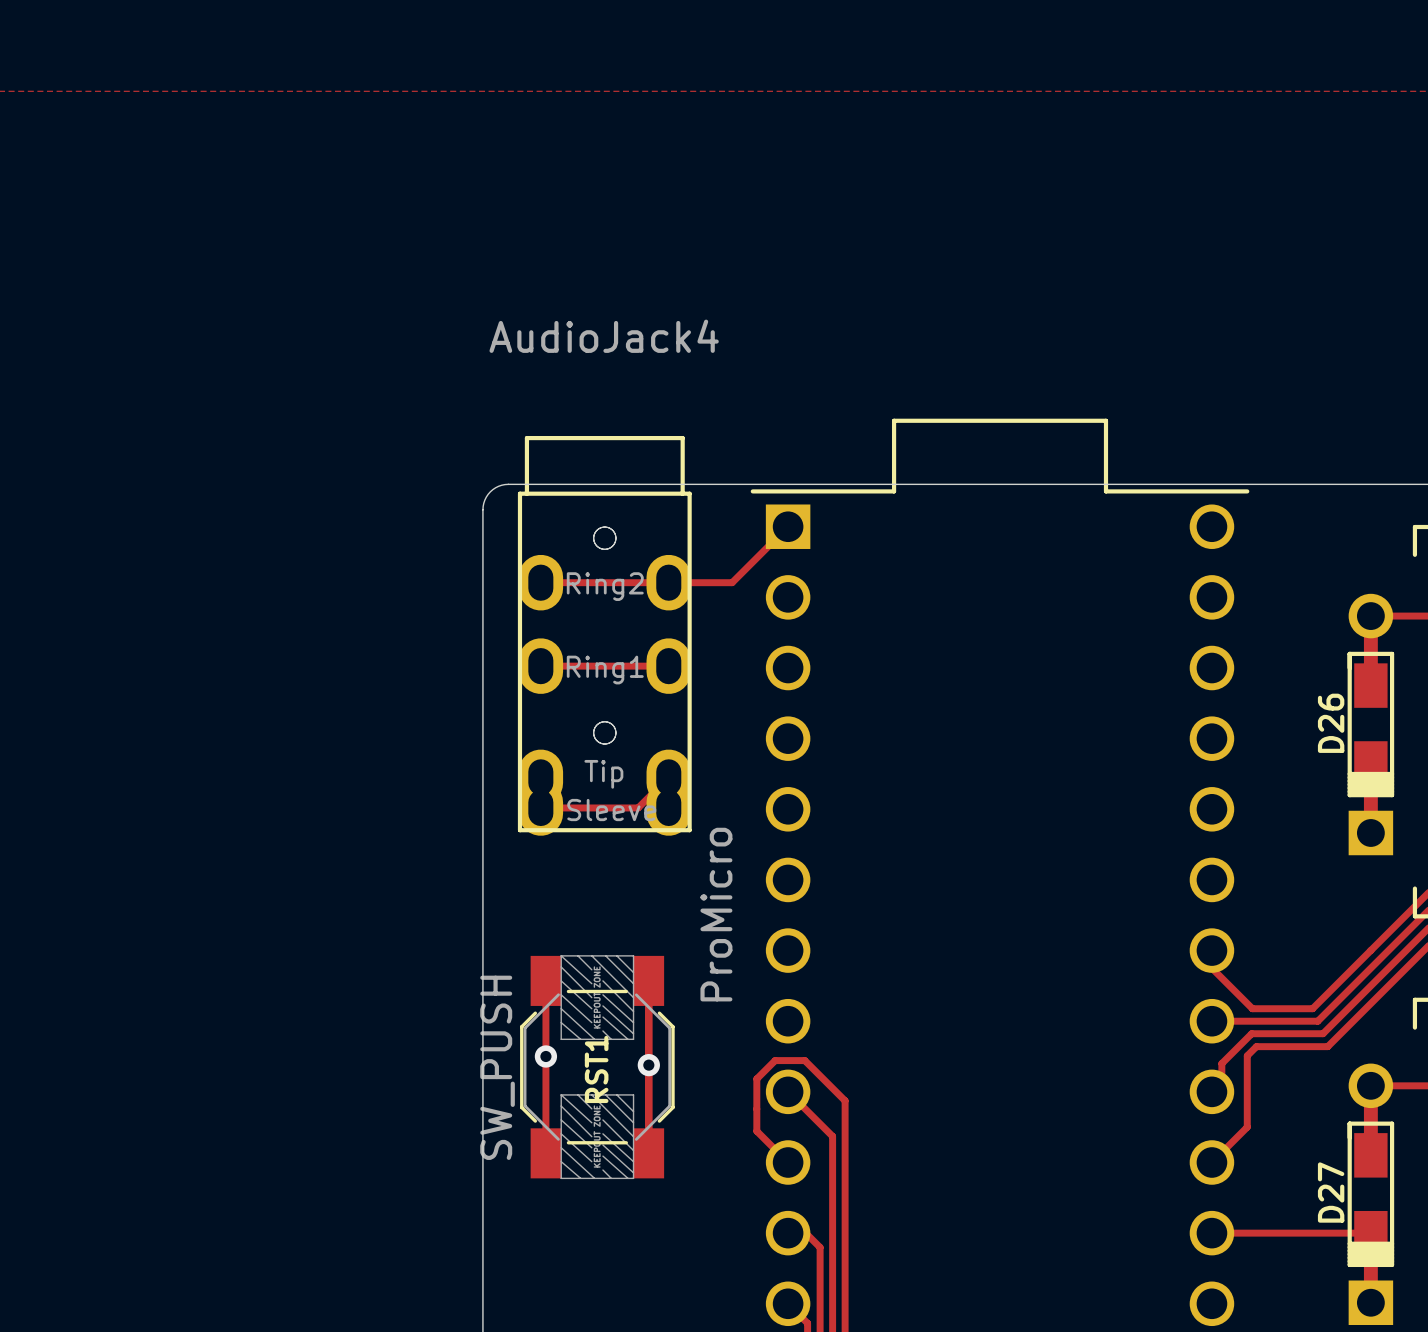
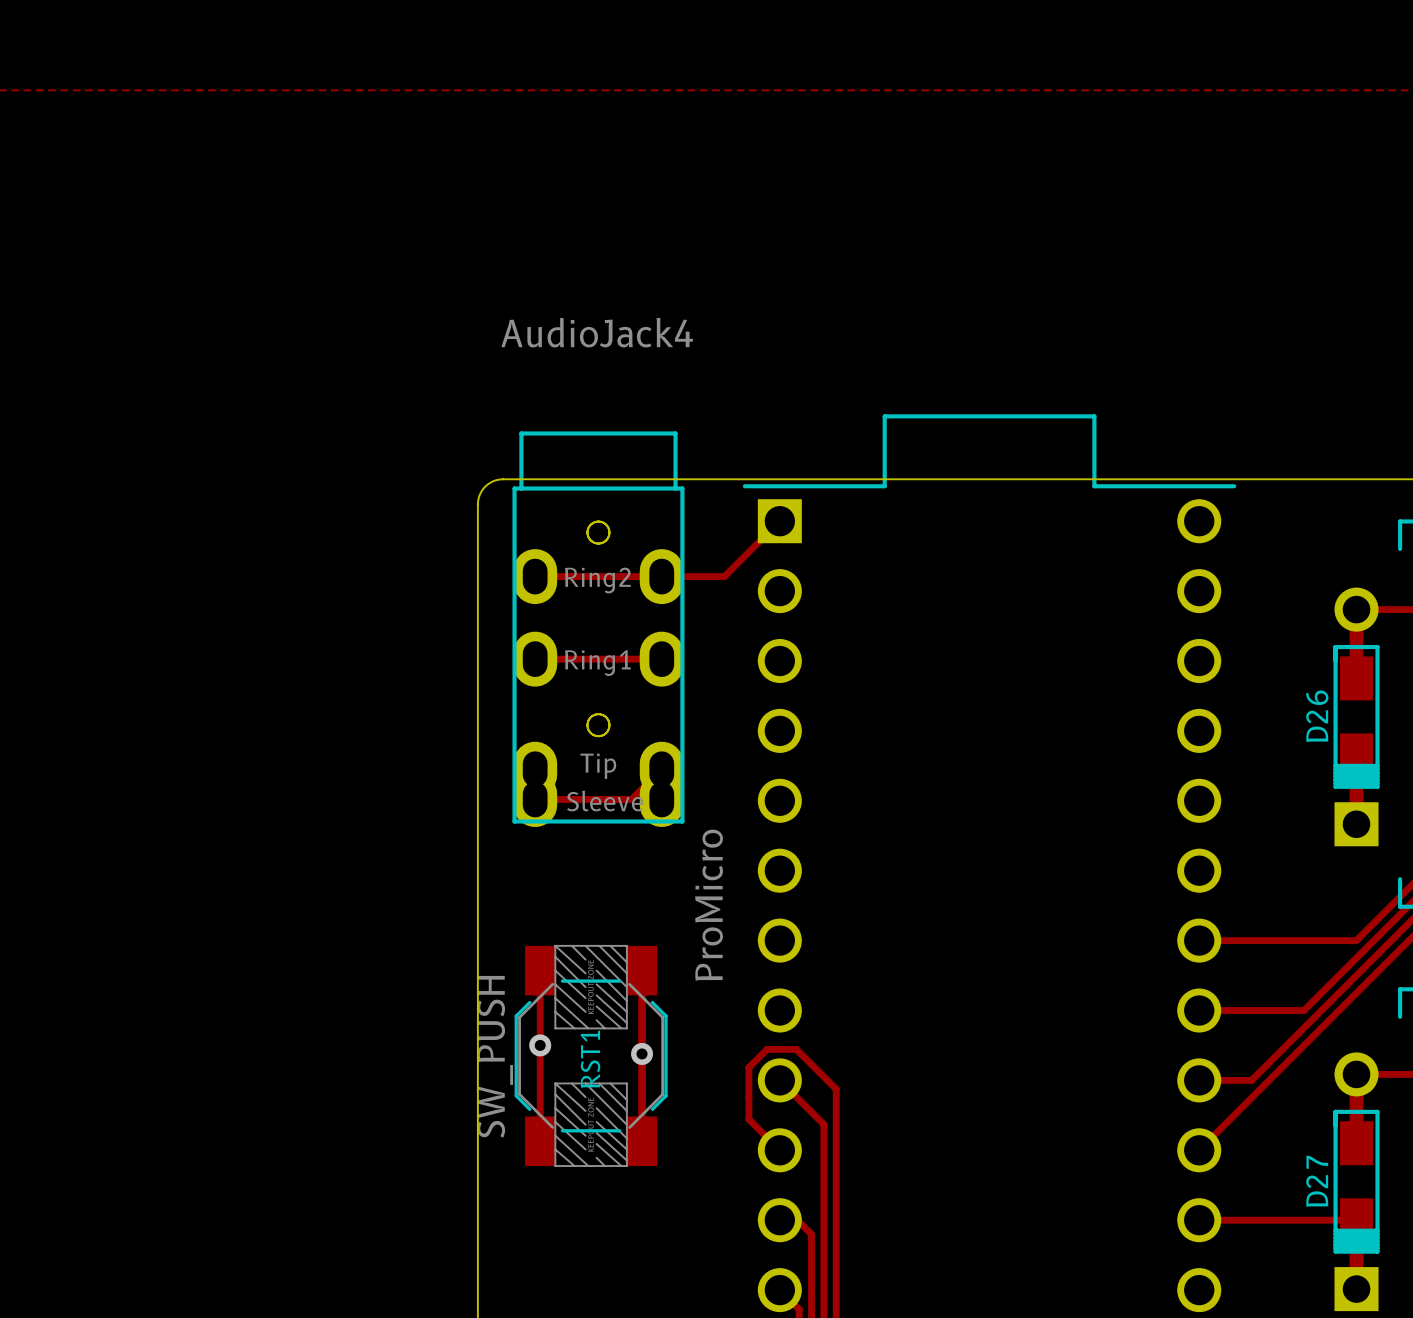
track: (1211, 950) (1211, 968) (1252, 1008) (1312, 1008) (1370, 950) -> (1199, 940) (1356, 940)
track: (1323, 1033) (1251, 1033) (1221, 1063) (1221, 1081) (1211, 1091) -> (1309, 1022) (1251, 1080) (1199, 1080)
track: (1327, 1046) (1256, 1046) (1247, 1055) (1247, 1127) -> (1313, 1035) (1234, 1115)

